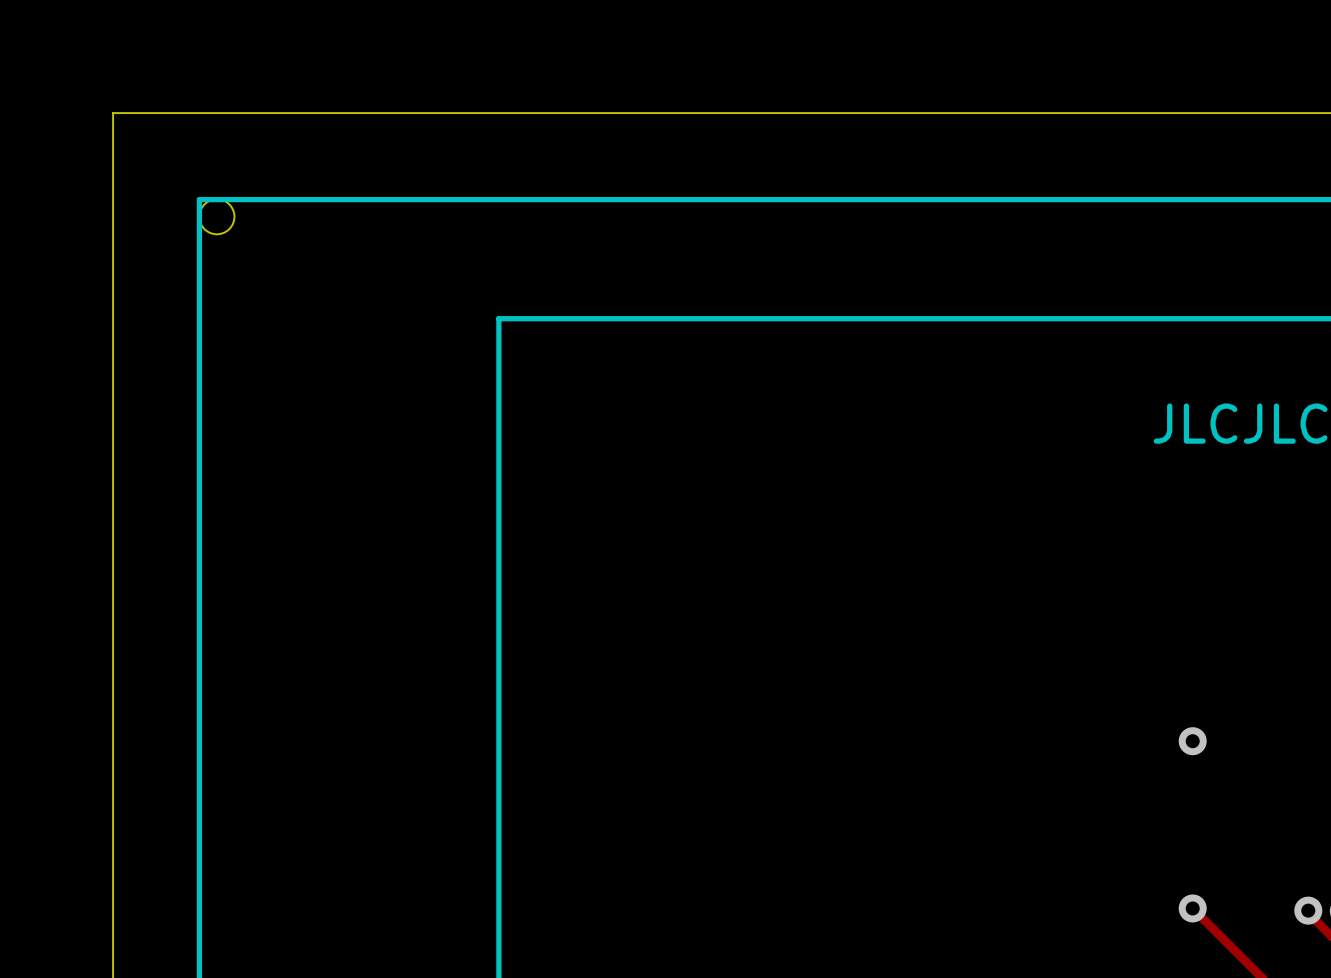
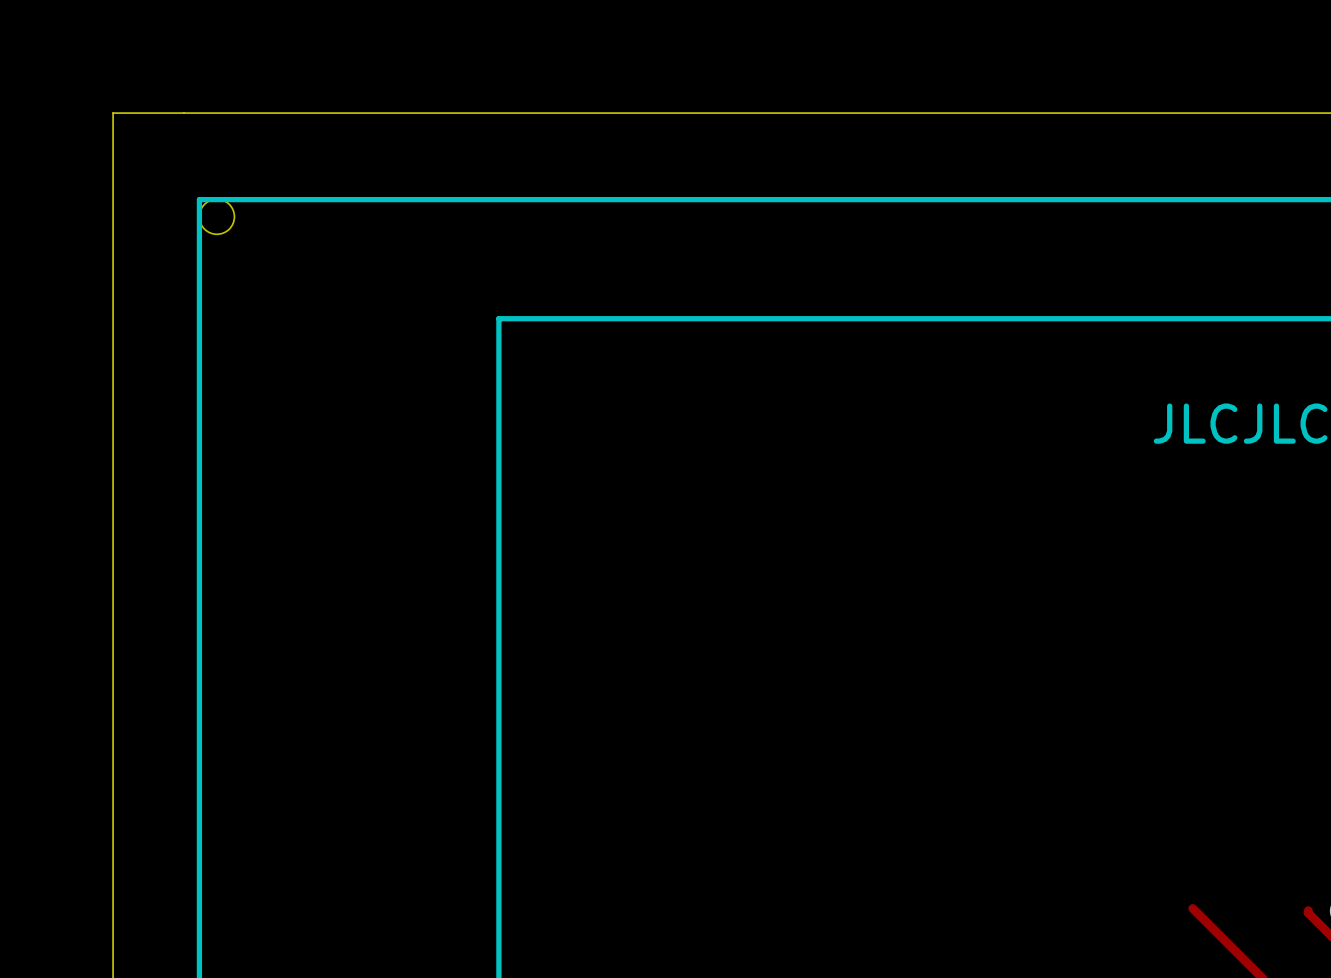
via: (1192, 741) -> none
via: (1192, 908) -> none
via: (1308, 910) -> none

